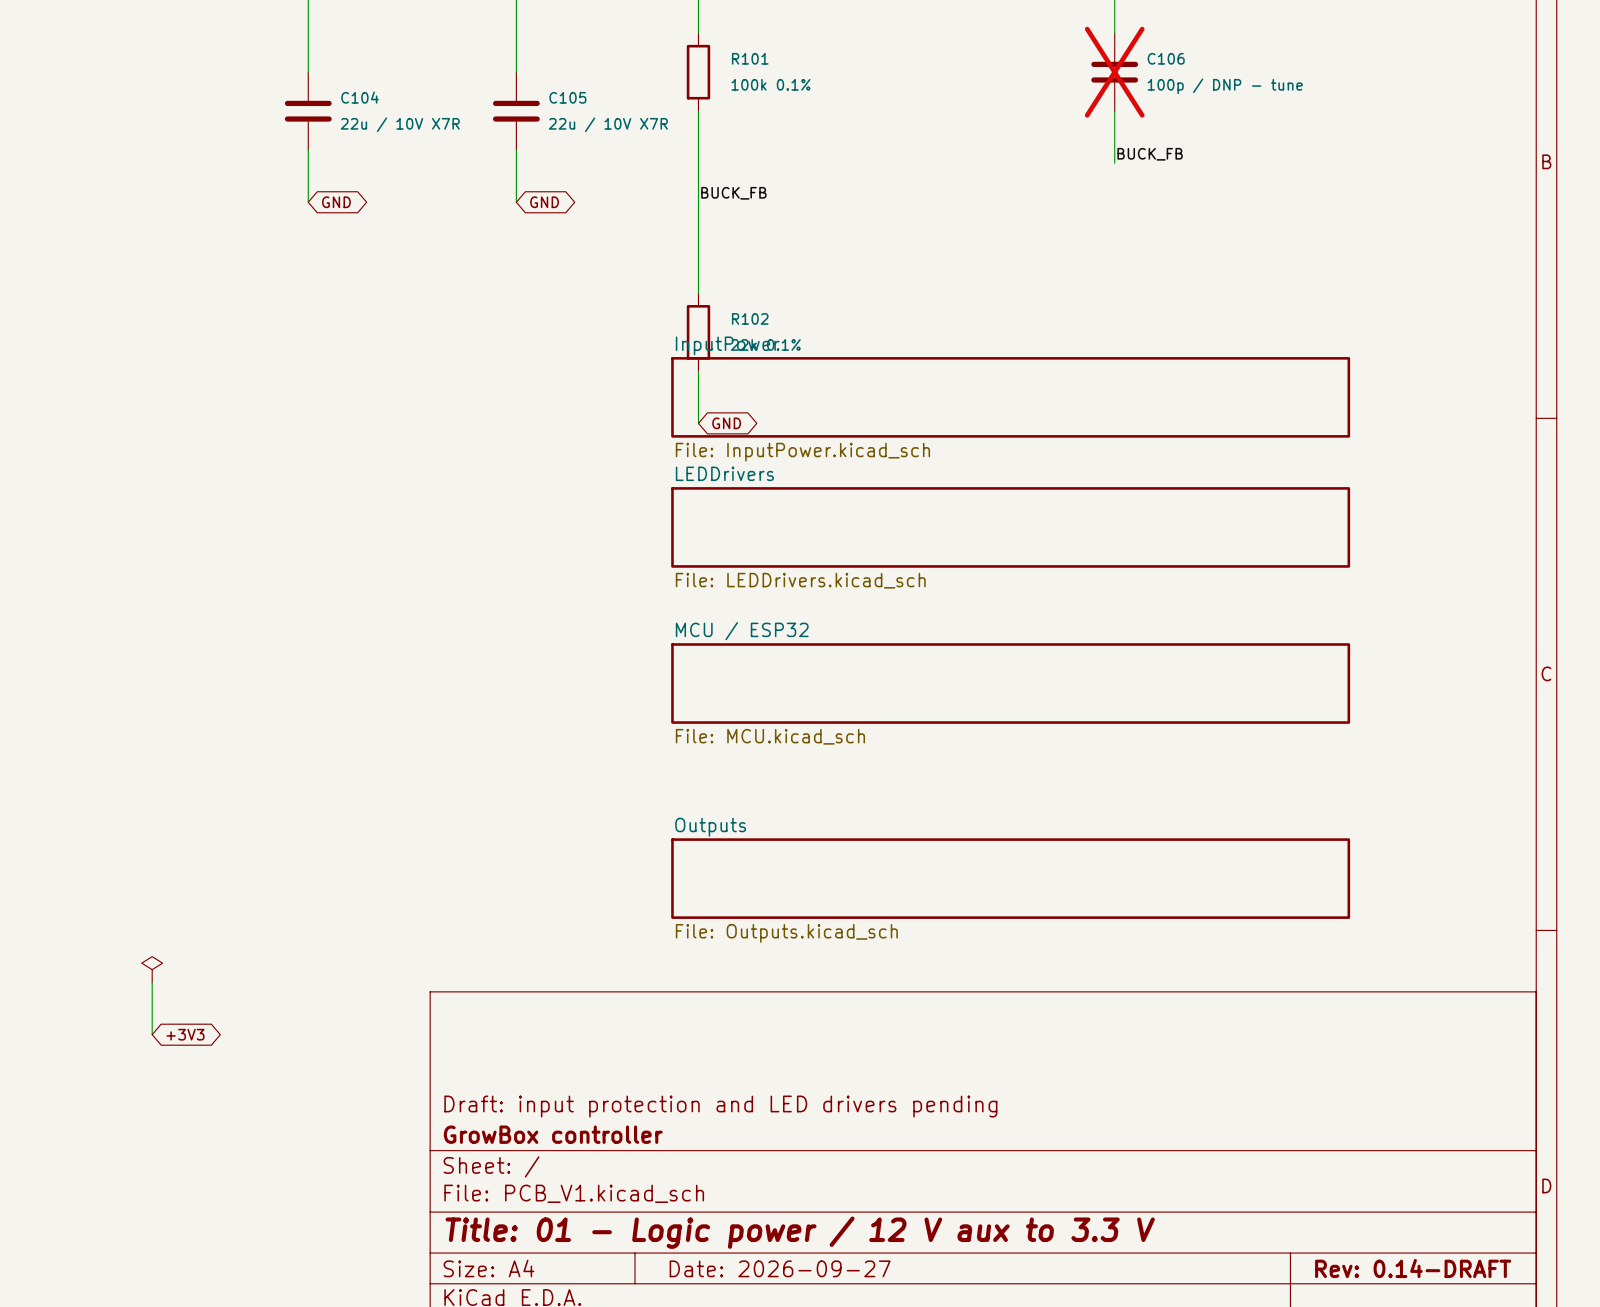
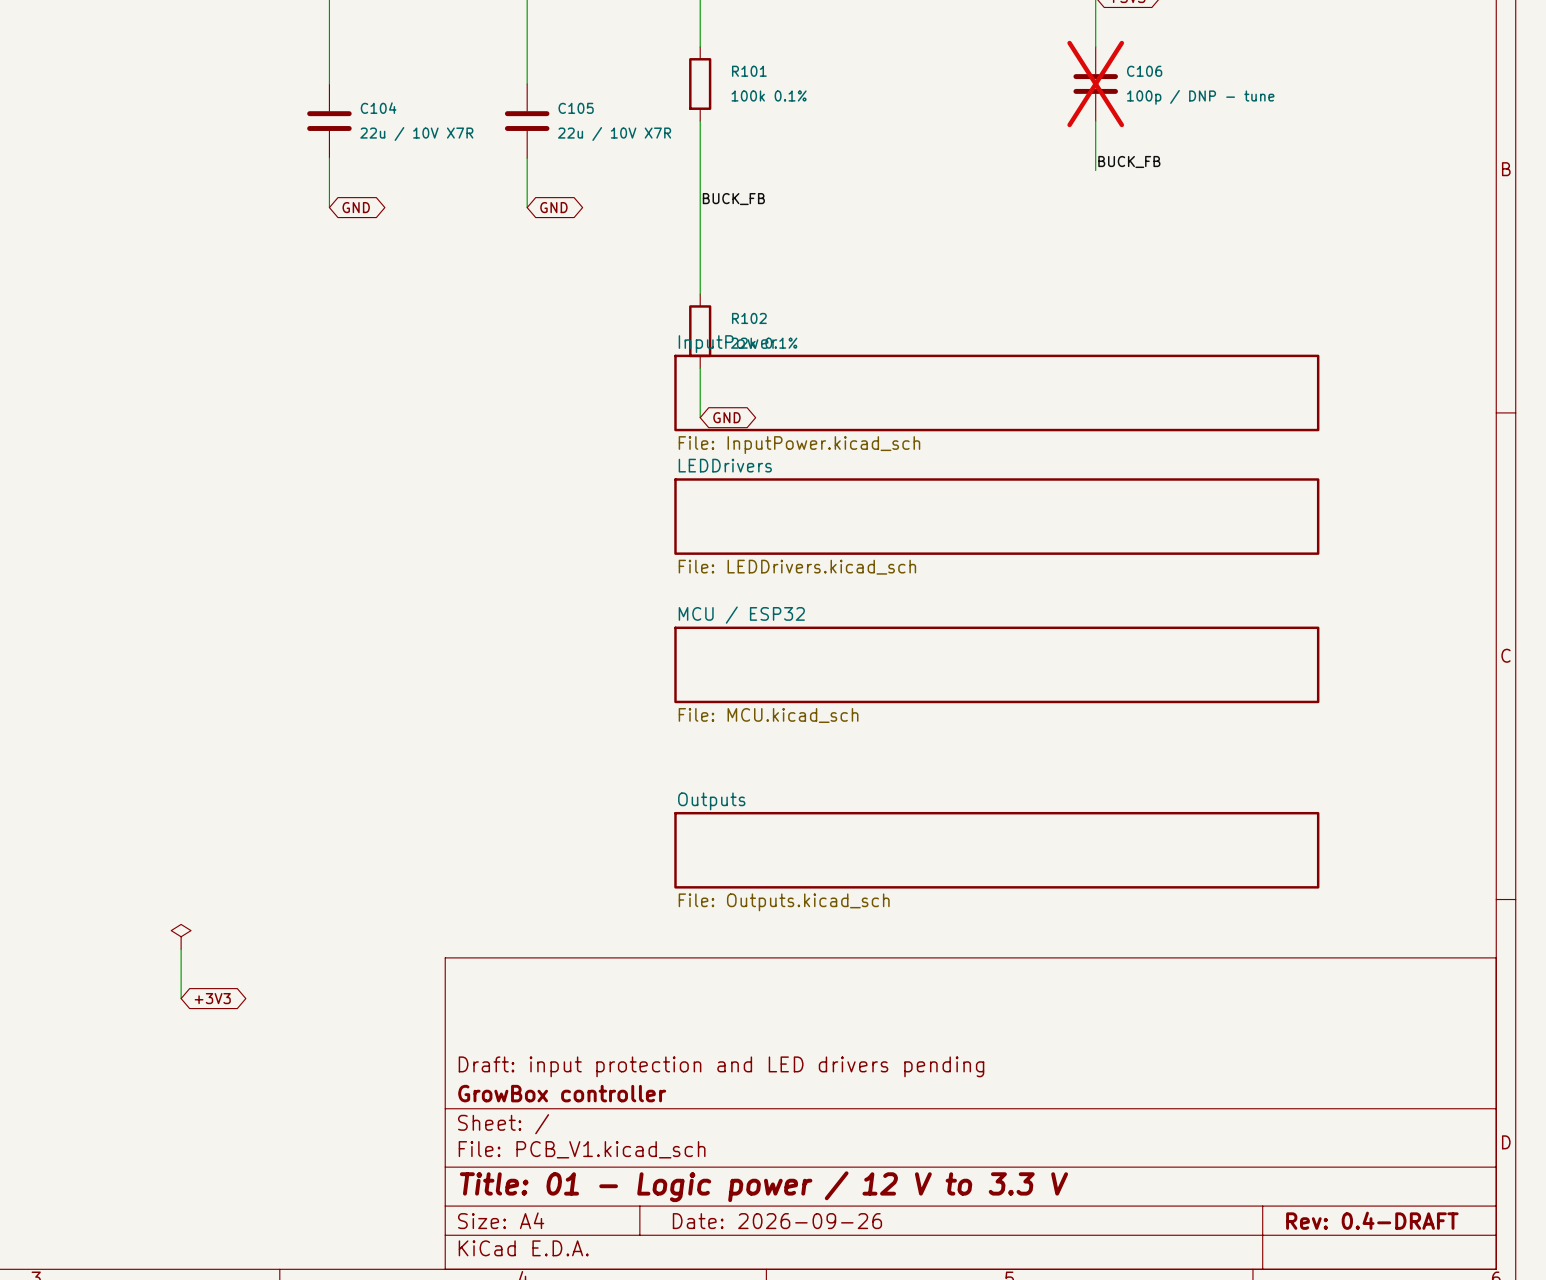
title block: Title: 01 - Logic power / 12 V aux to 3.3 V (800, 1232) -> Title: 01 - Logic power / 12 V to 3.3 V (763, 1186)
title block: Date: 2026-09-27 (780, 1268) -> Date: 2026-09-26 (777, 1221)
title block: Rev: 0.14-DRAFT (1413, 1268) -> Rev: 0.4-DRAFT (1372, 1220)

